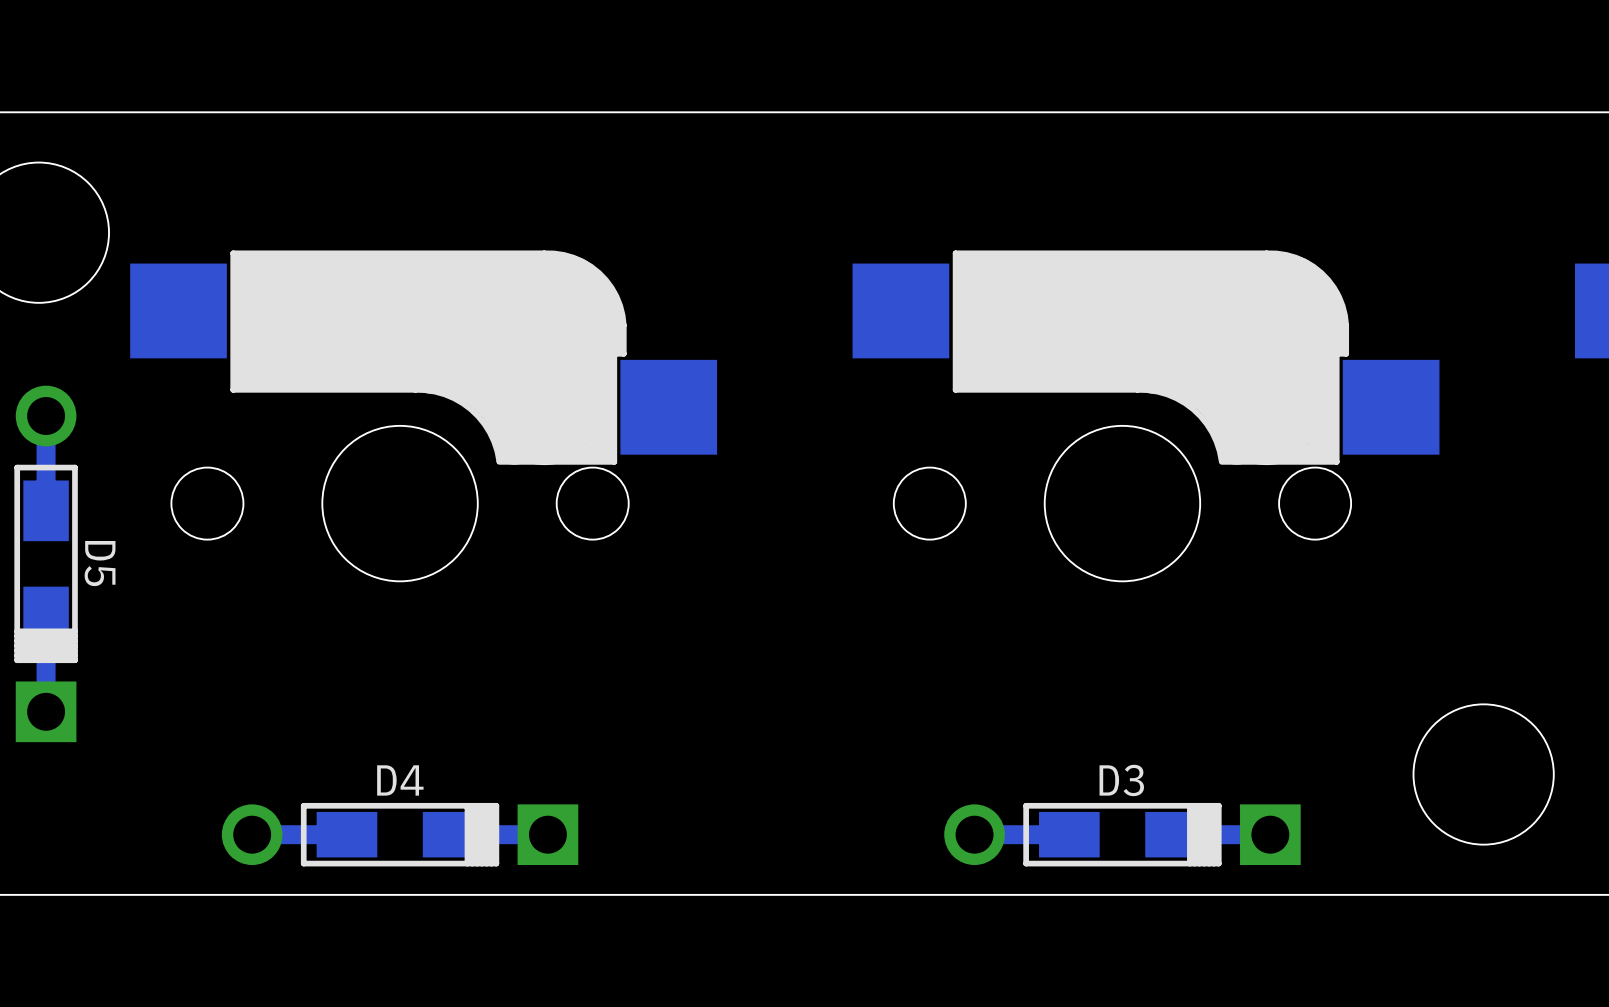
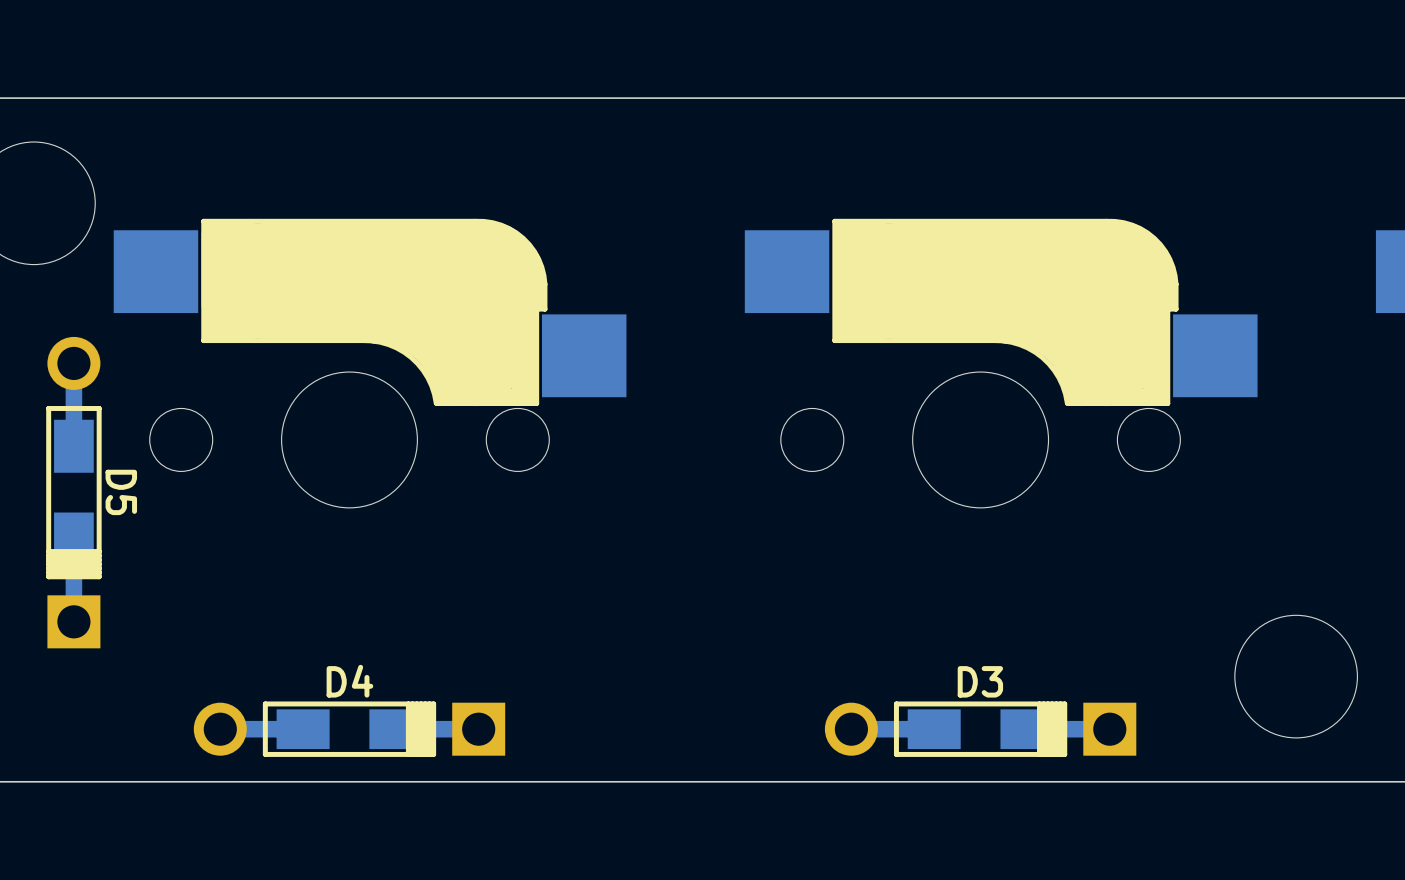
D5 position: (46, 563) -> (73, 492)

